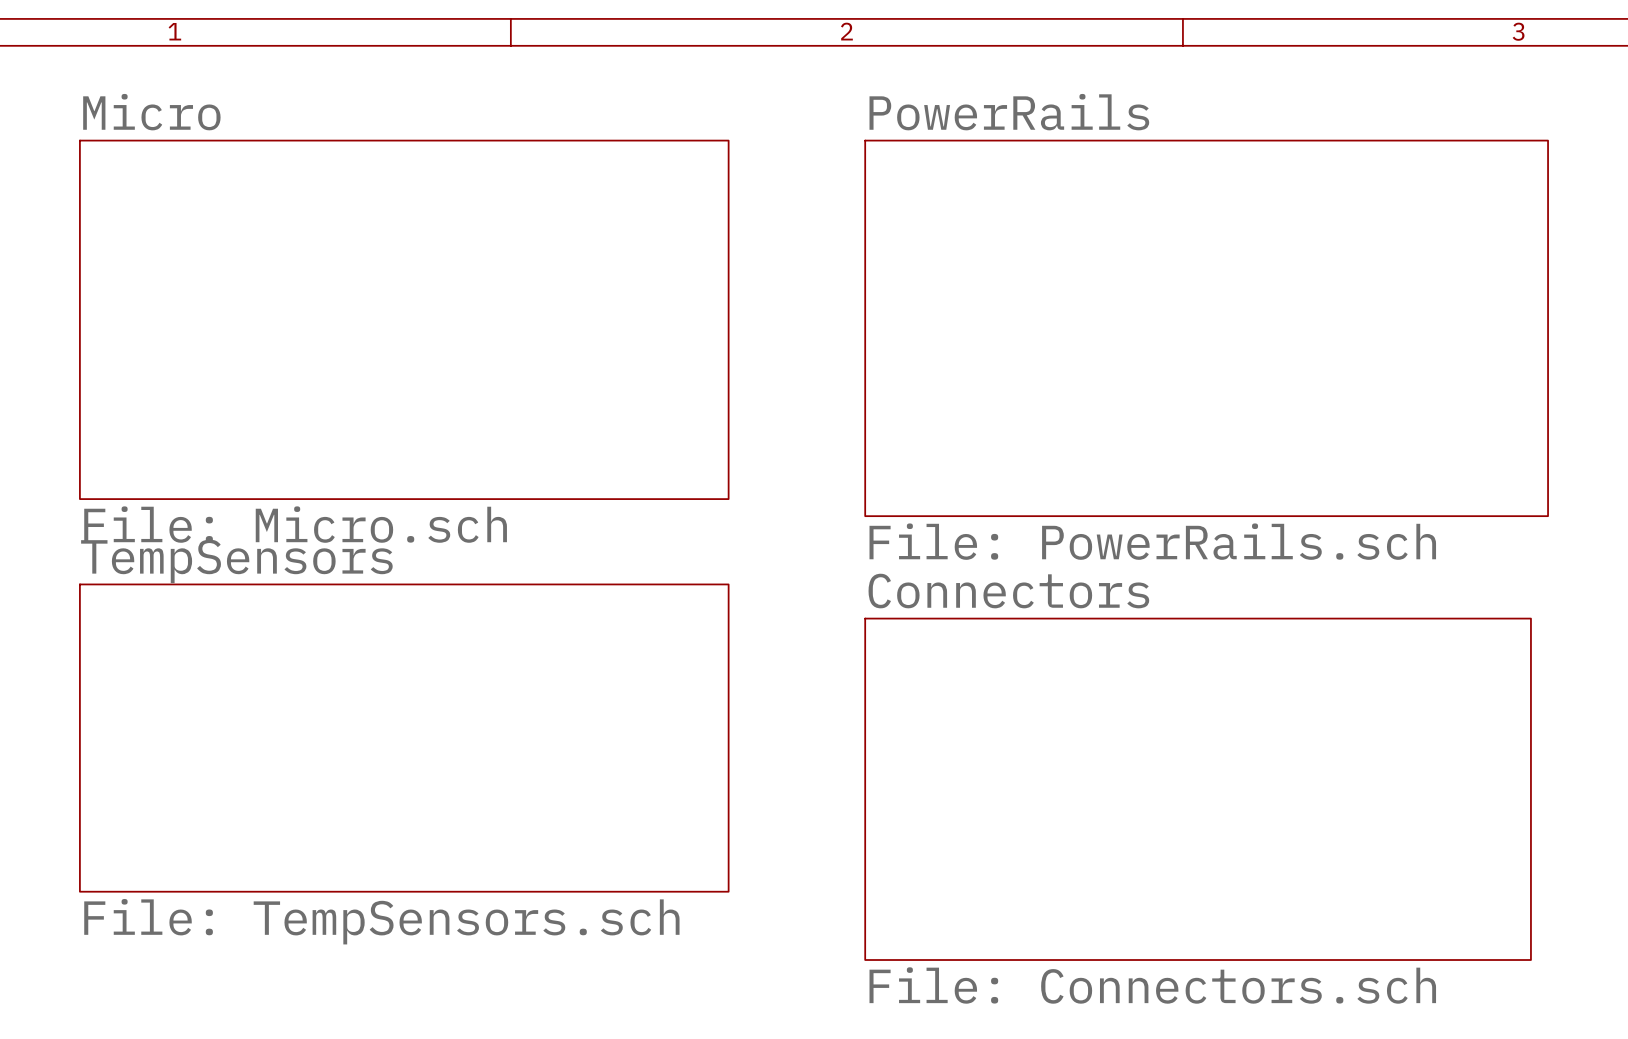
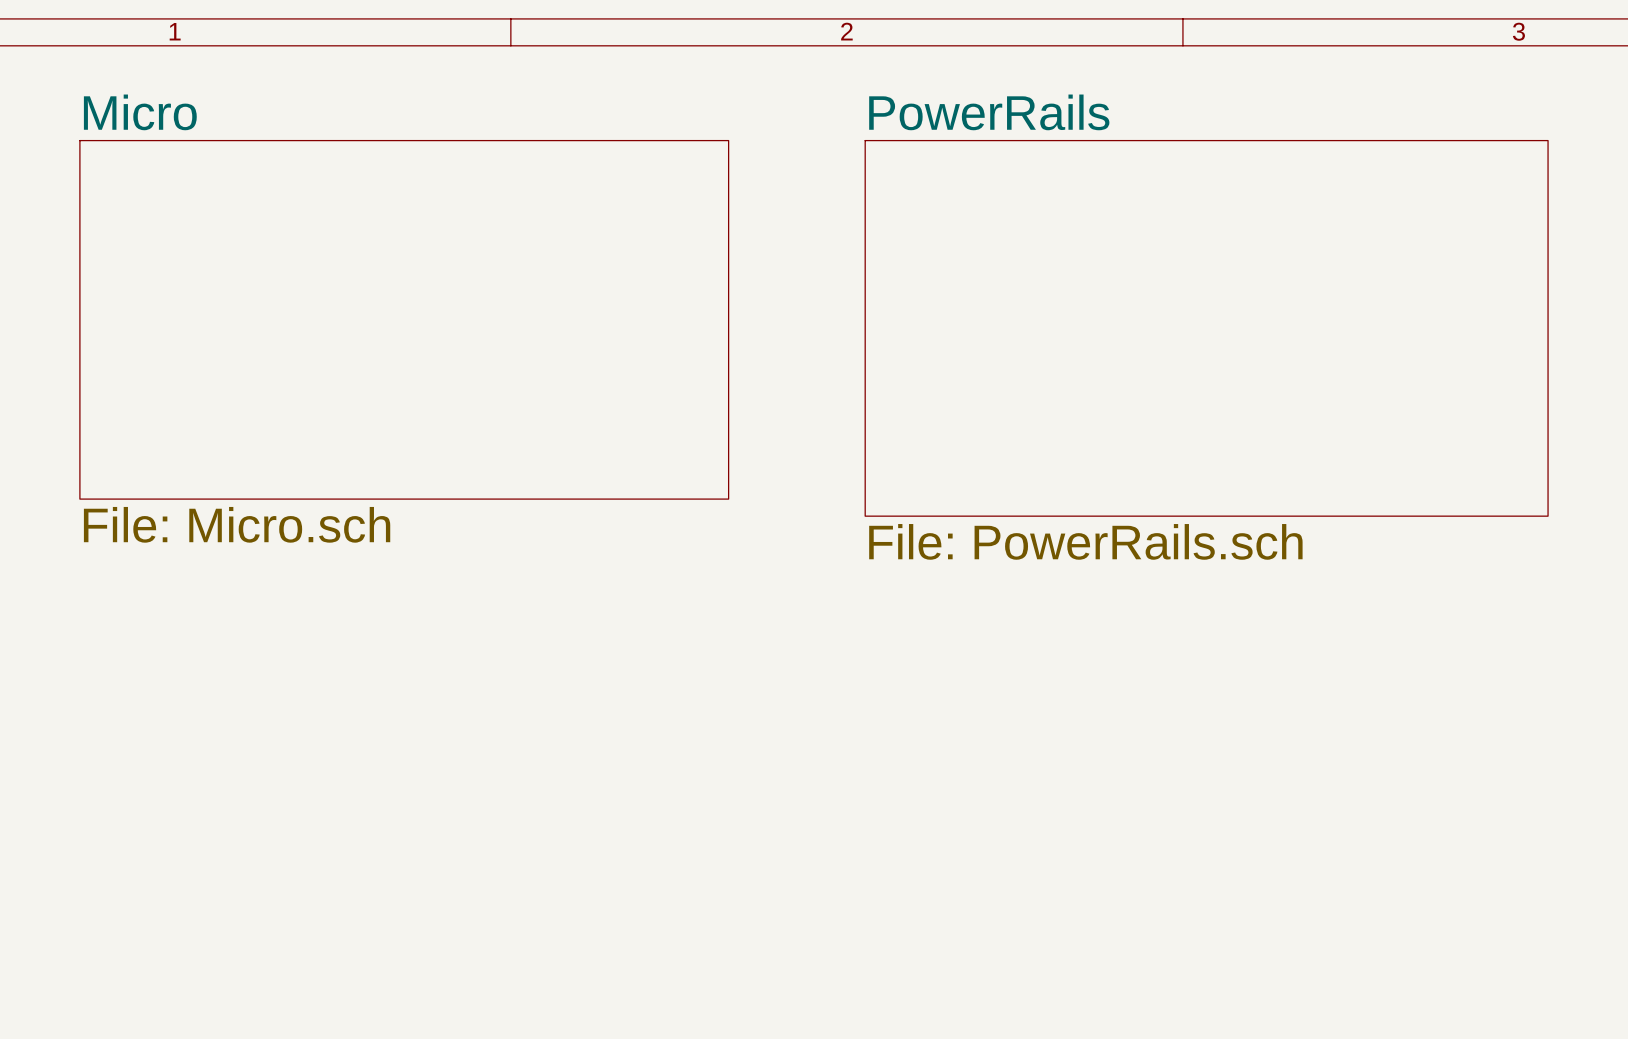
sheet TempSensors: File: TempSensors.sch (404, 738) -> none
sheet Connectors: File: Connectors.sch (1198, 789) -> none

